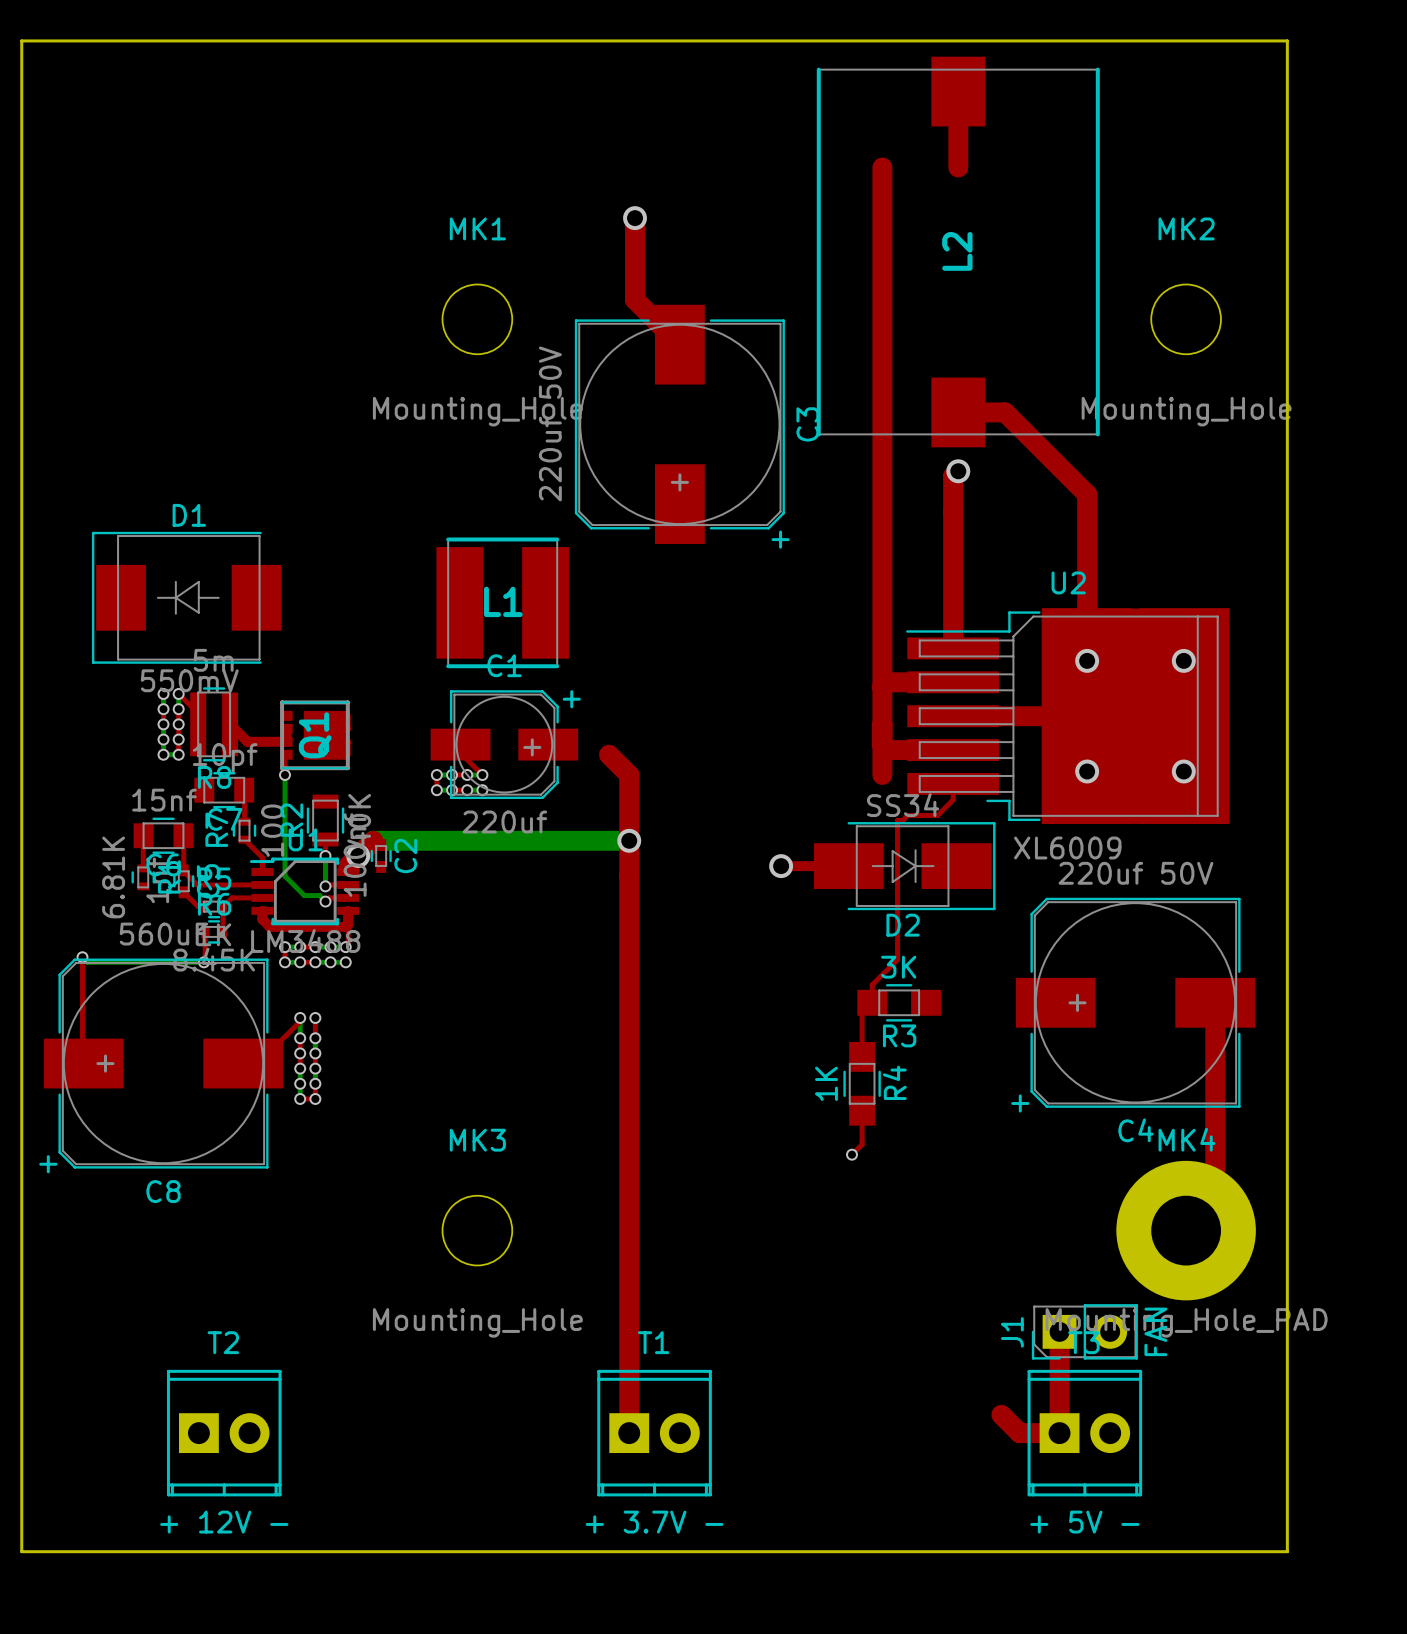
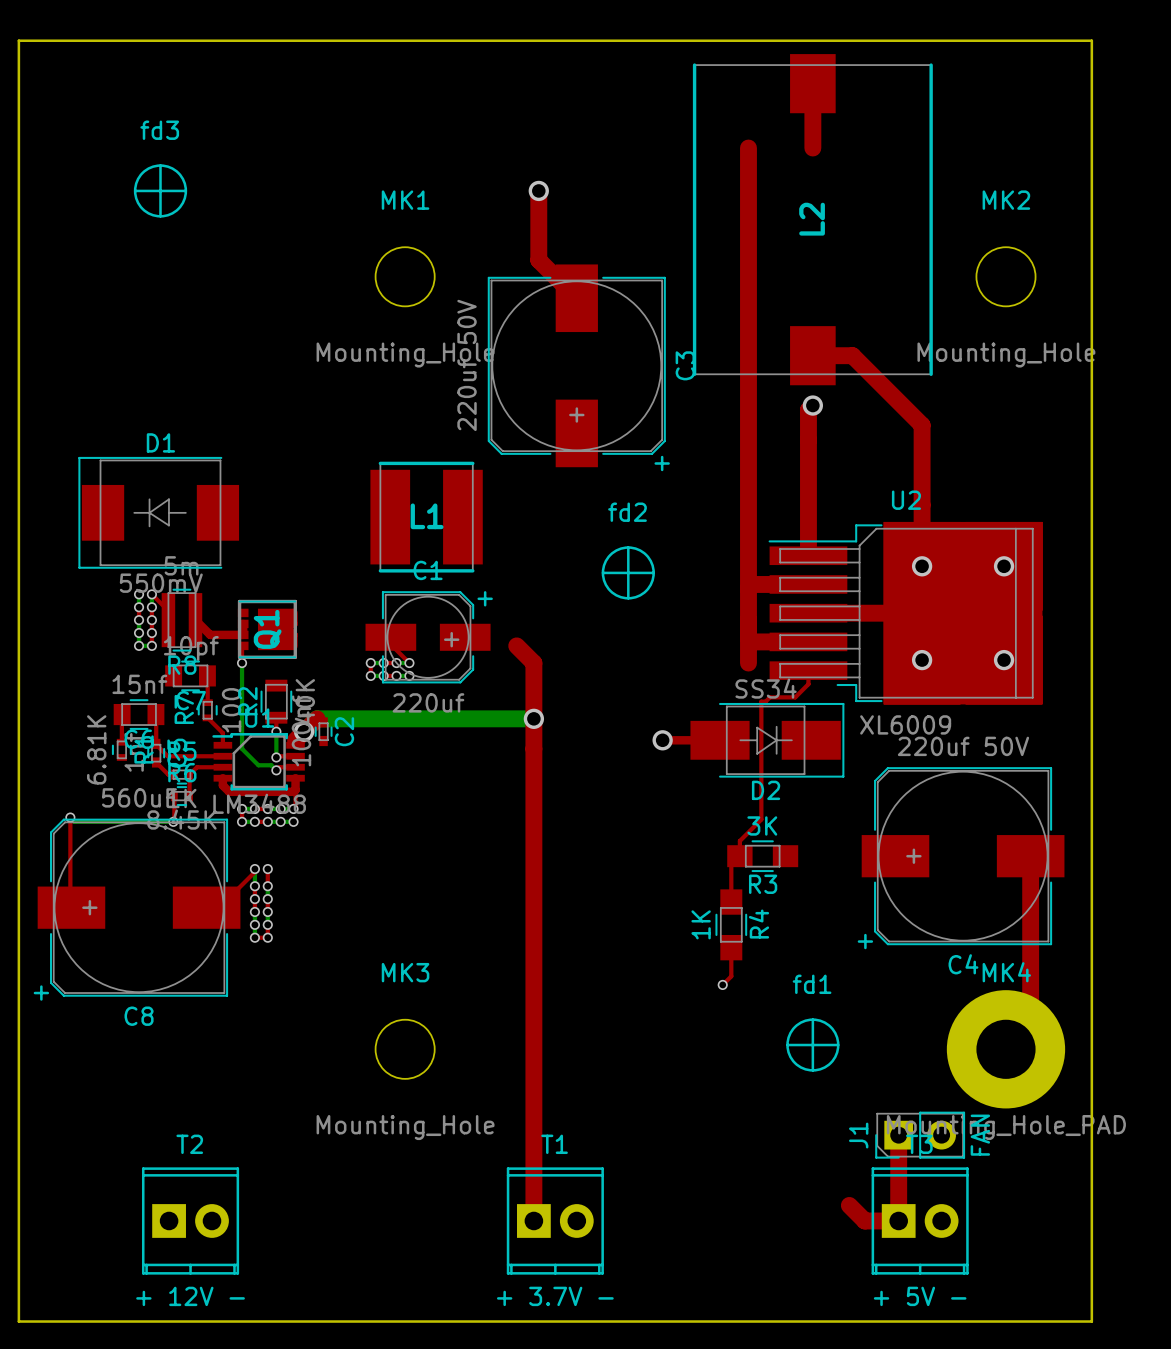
fd3: none -> (160, 190)
fd2: none -> (628, 572)
fd1: none -> (812, 1045)

